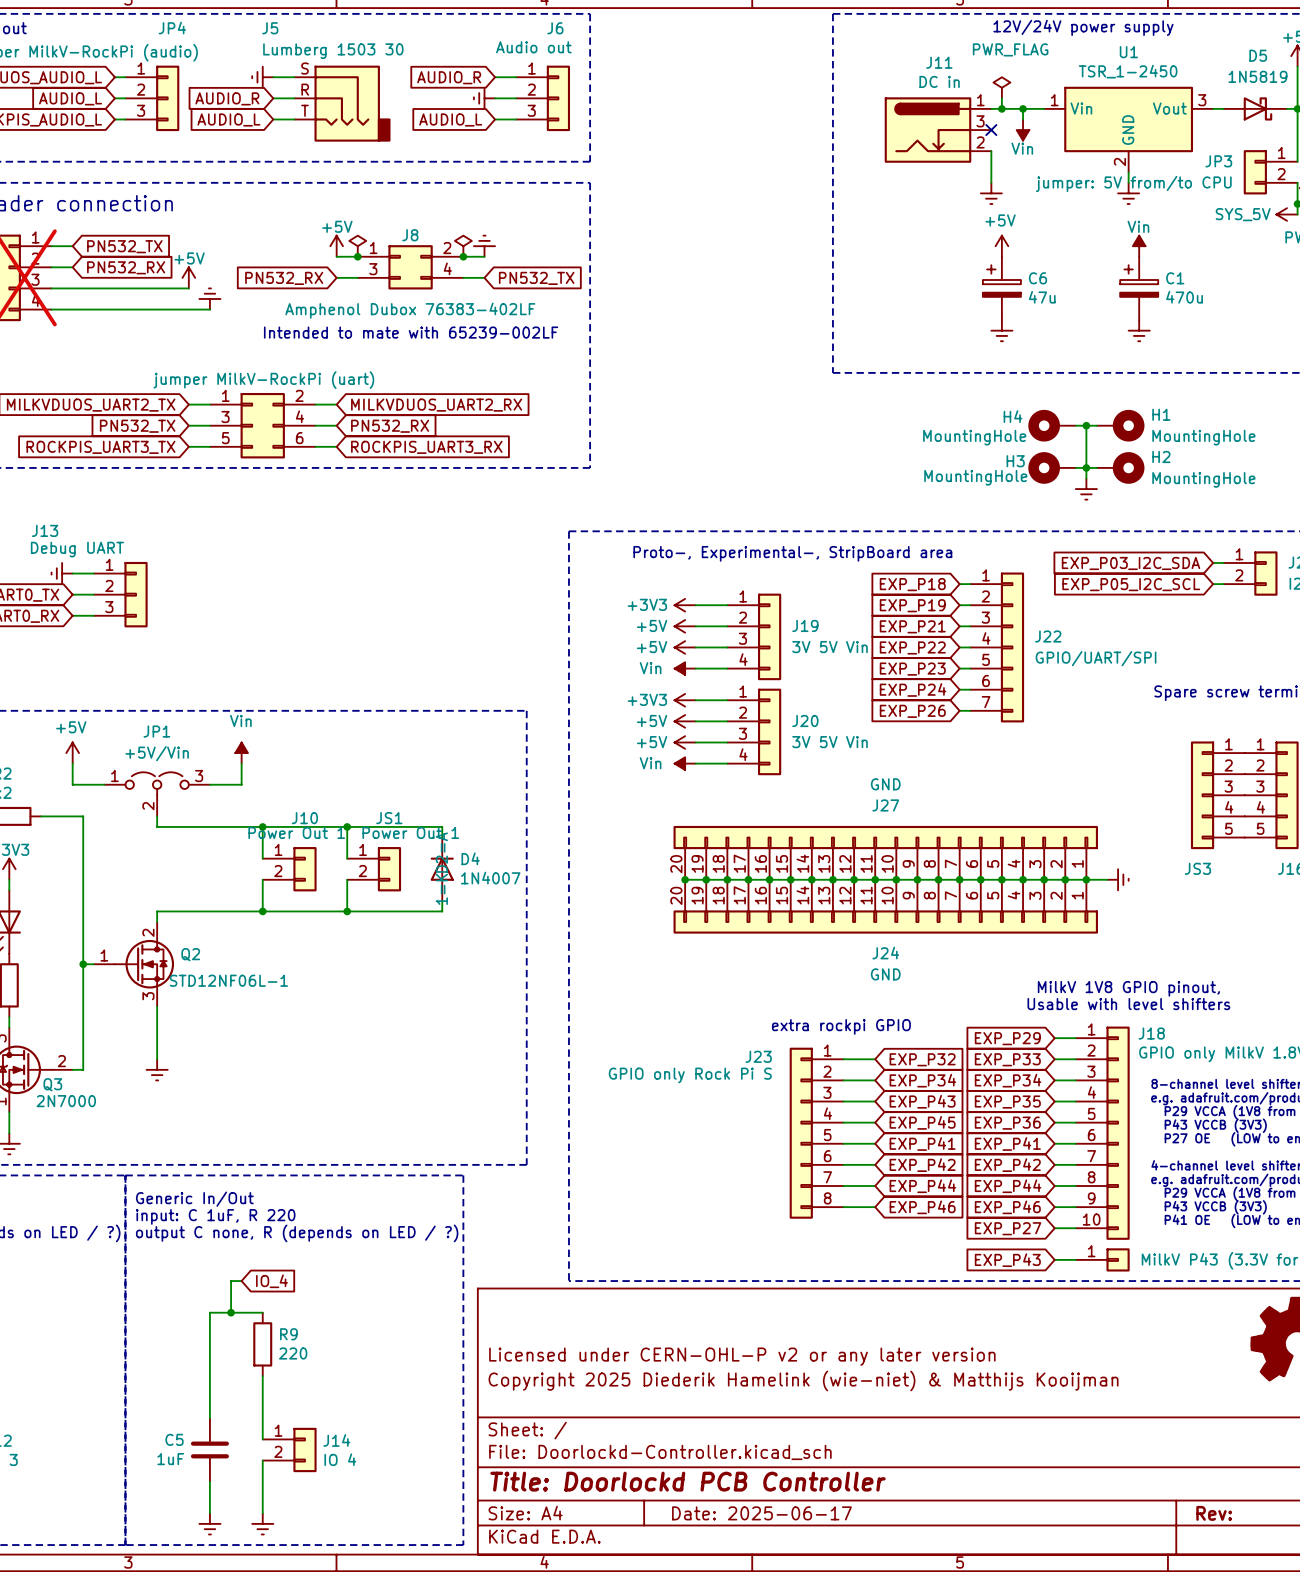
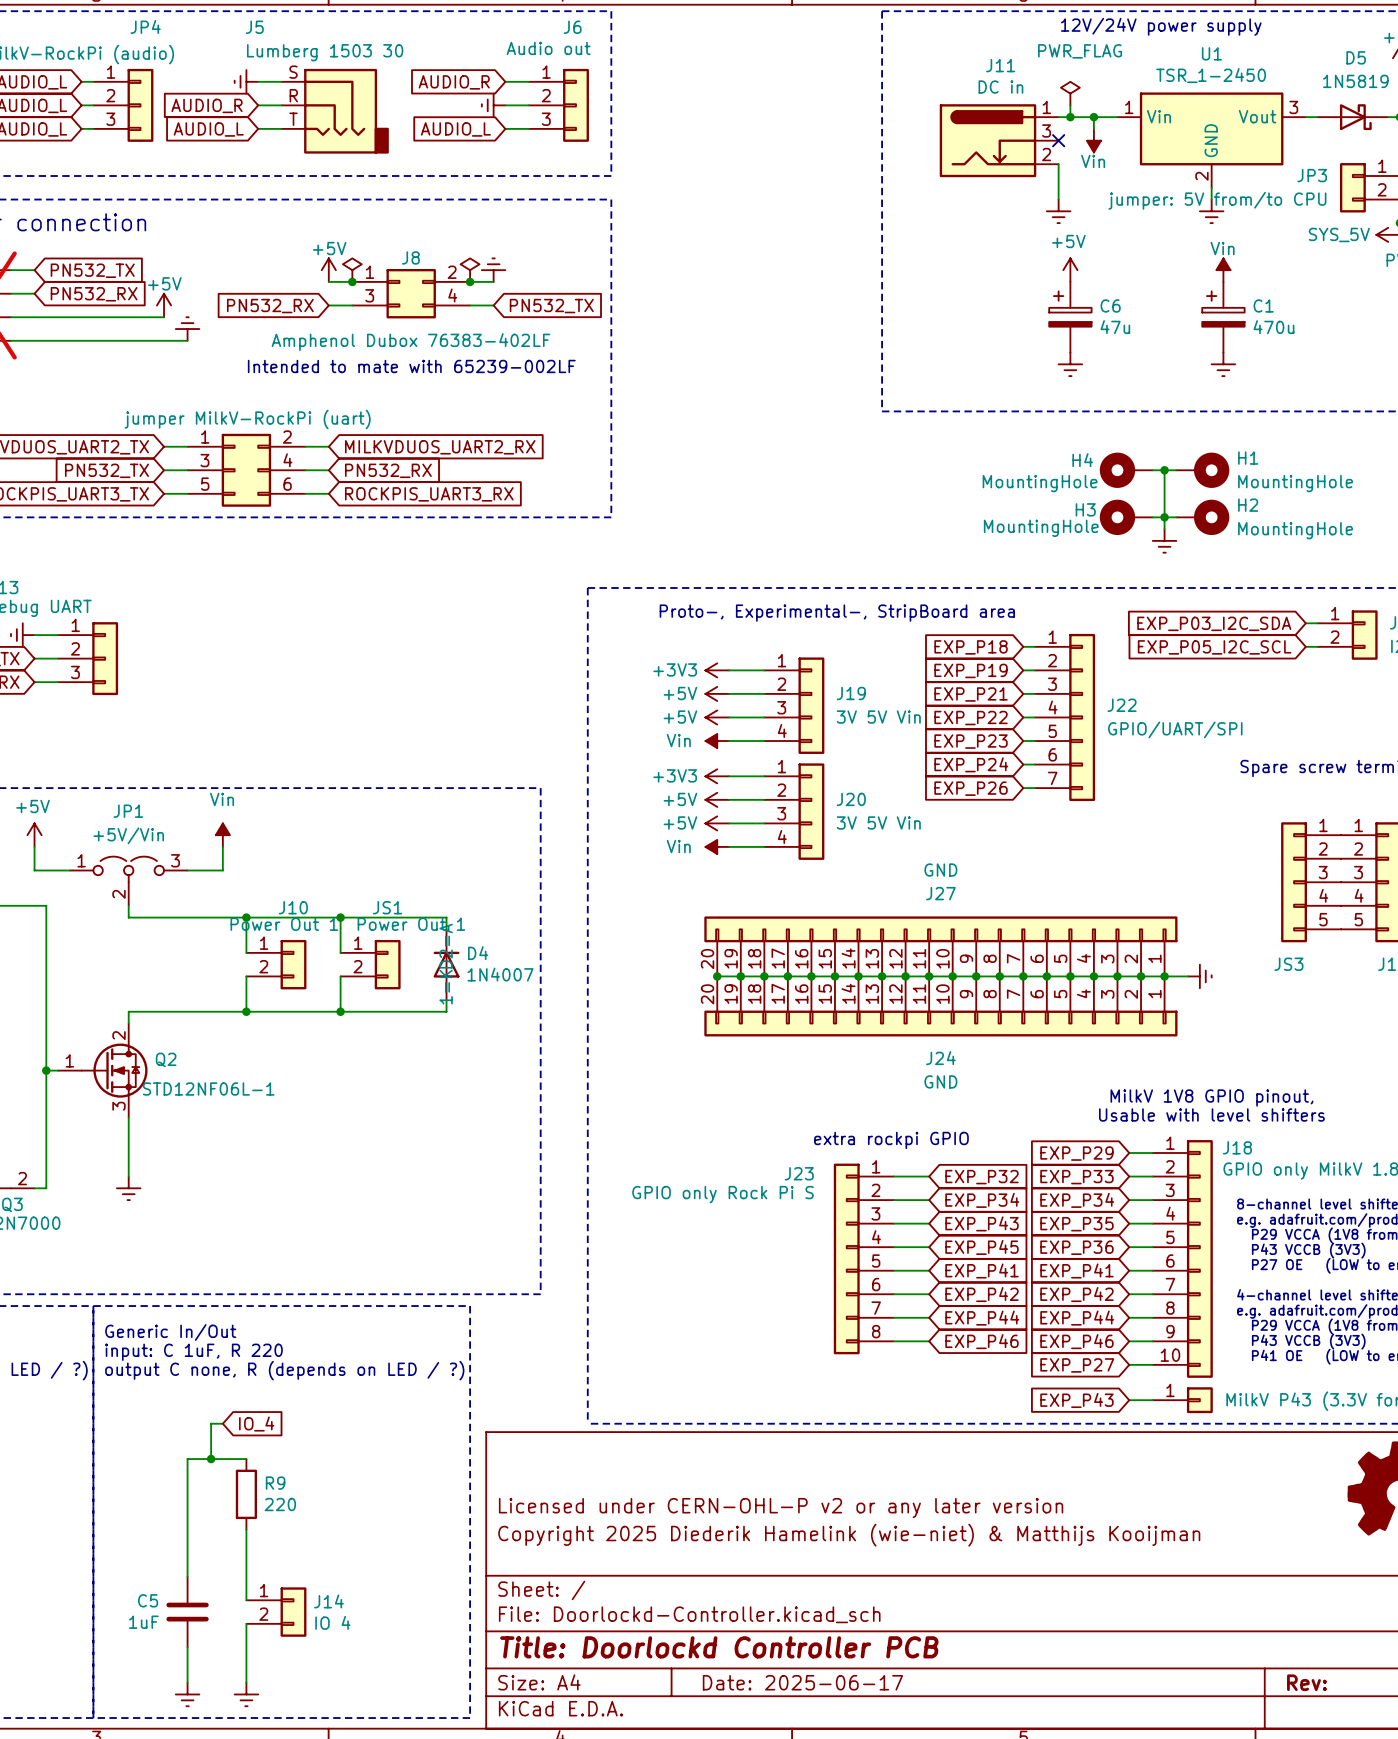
title block: Title: Doorlockd PCB Controller (688, 1481) -> Title: Doorlockd Controller PCB (719, 1647)

